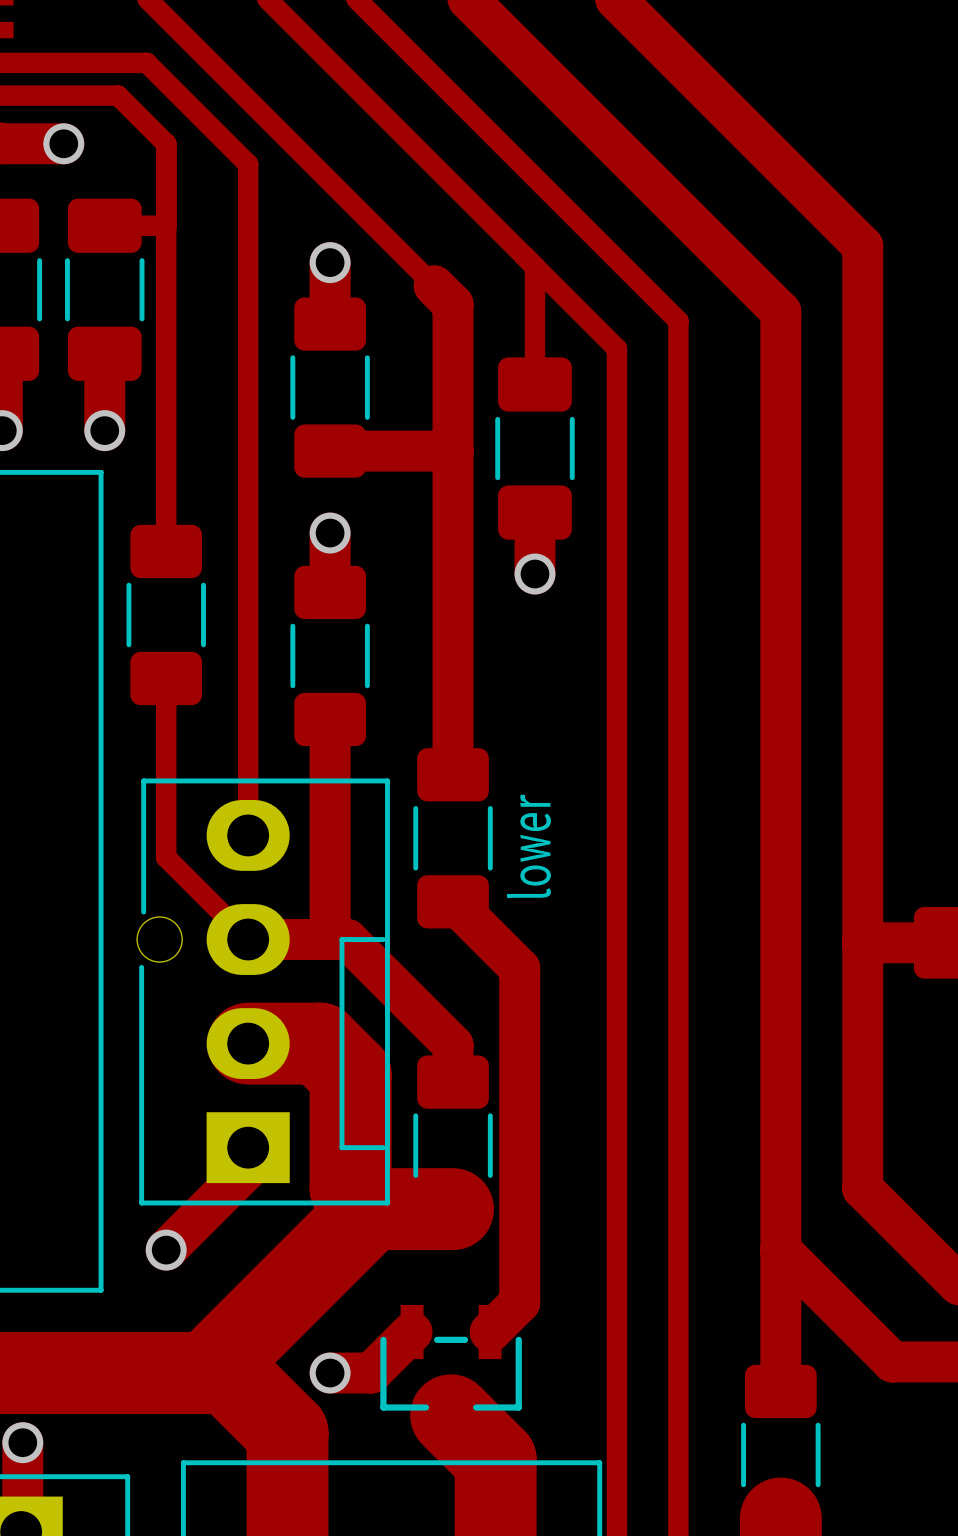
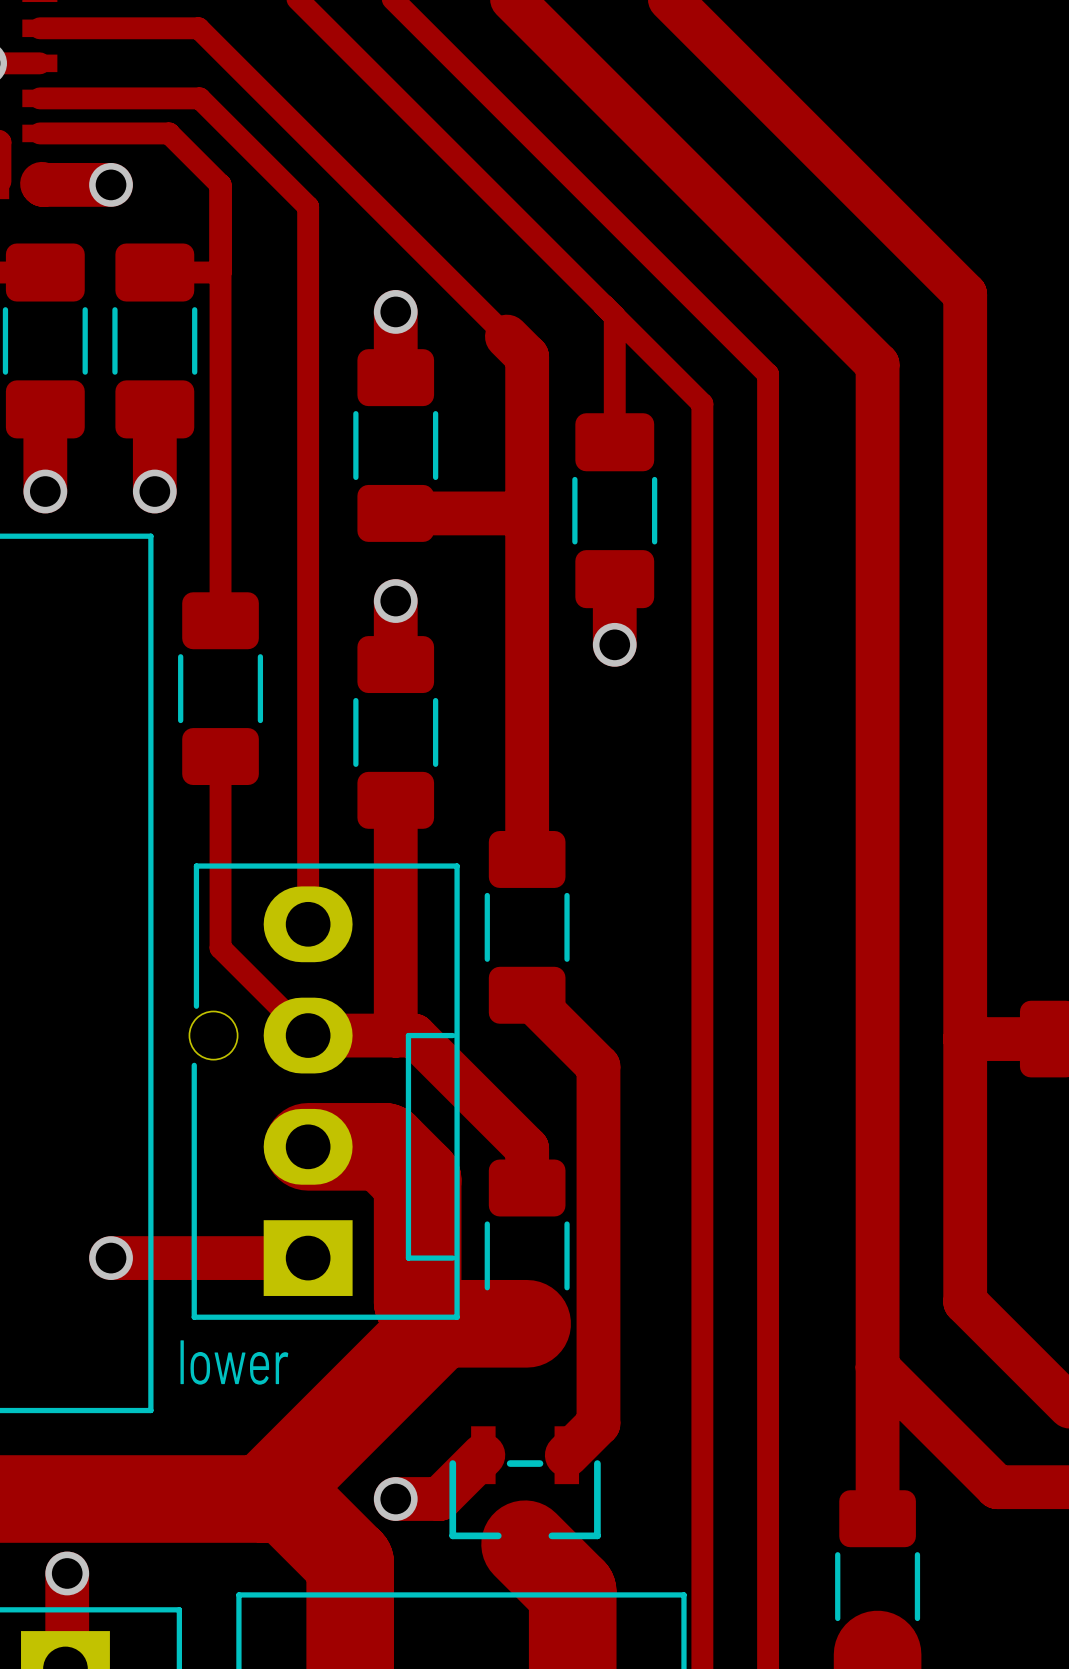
text rotation: 0° (528, 846) -> 90° clockwise (234, 1362)
text position: lower (528, 846) -> lower (234, 1362)
track: (248, 1147) (248, 1168) (166, 1250) -> (308, 1258) (111, 1258)
via position: (166, 1250) -> (111, 1258)

